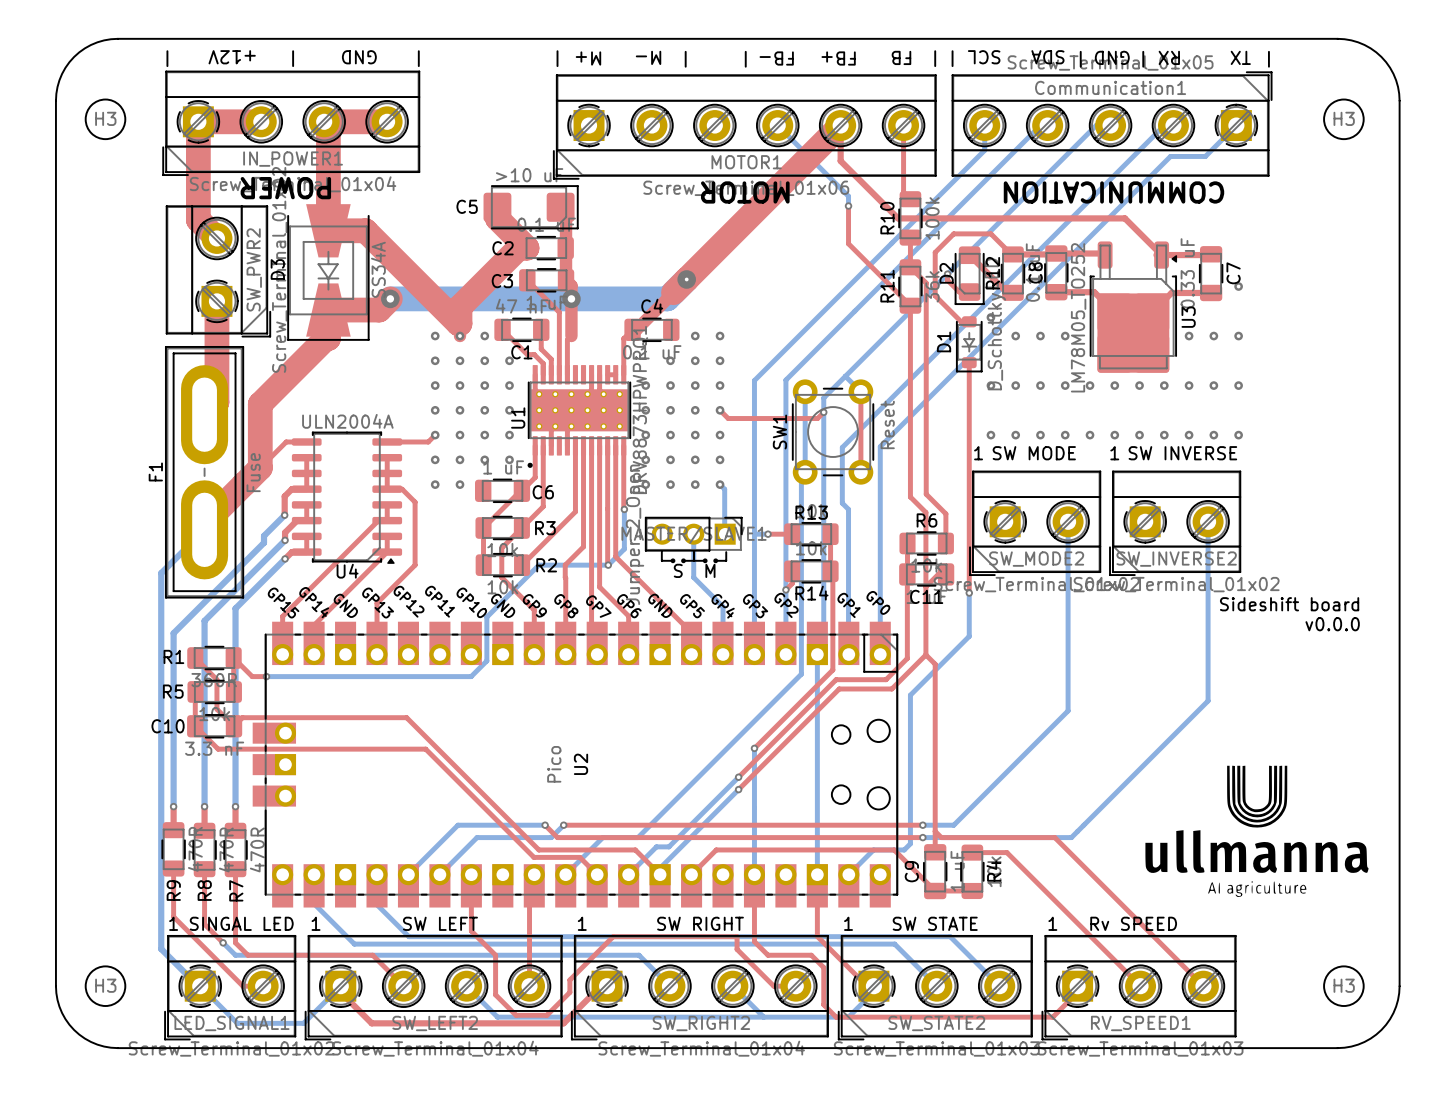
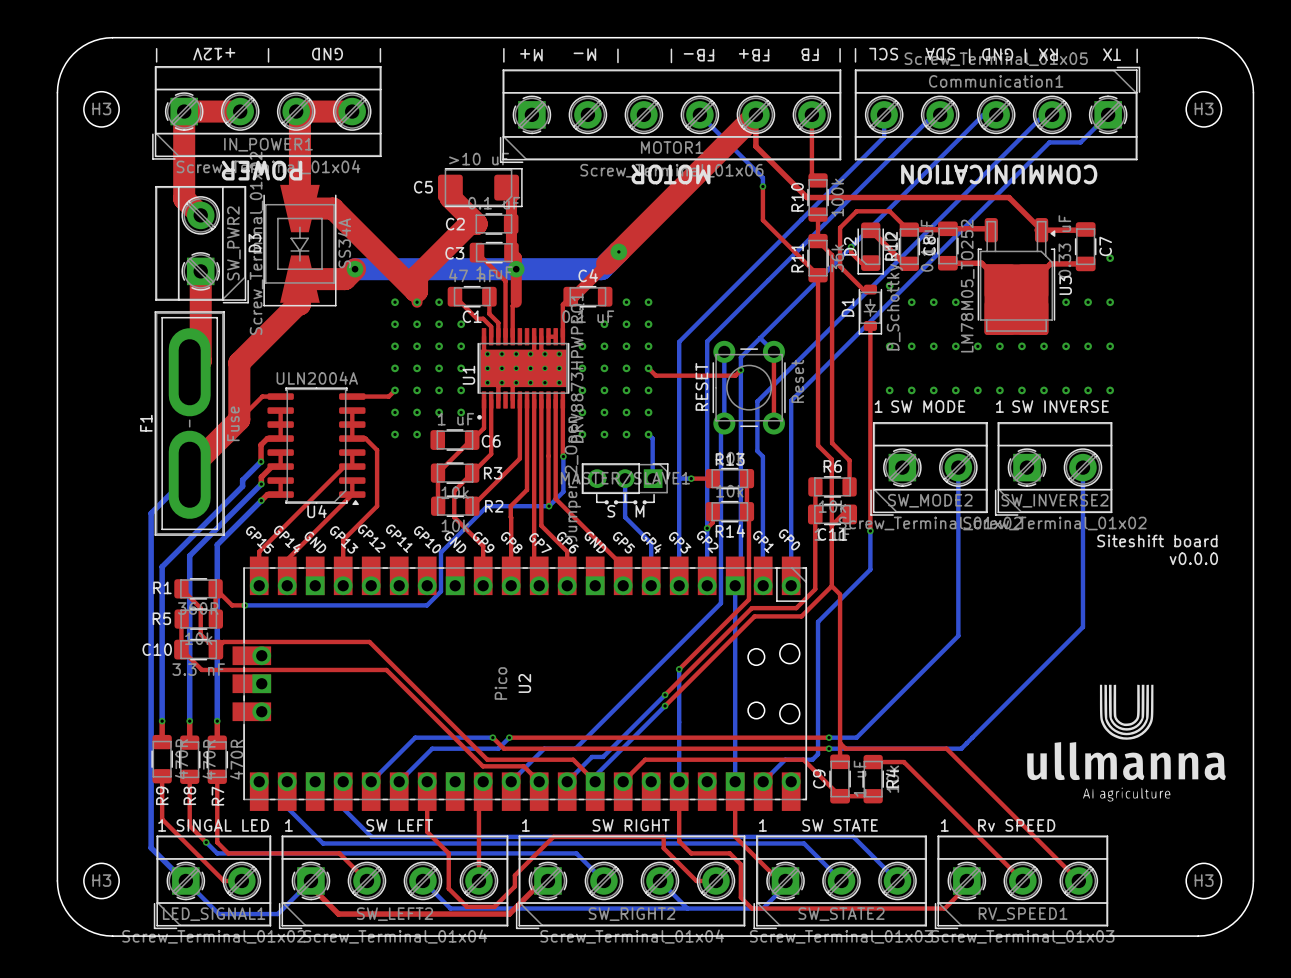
SW1 name: SW1 (779, 432) -> RESET (701, 386)
text: Sideshift board (1289, 604) -> Siteshift board (1157, 540)

